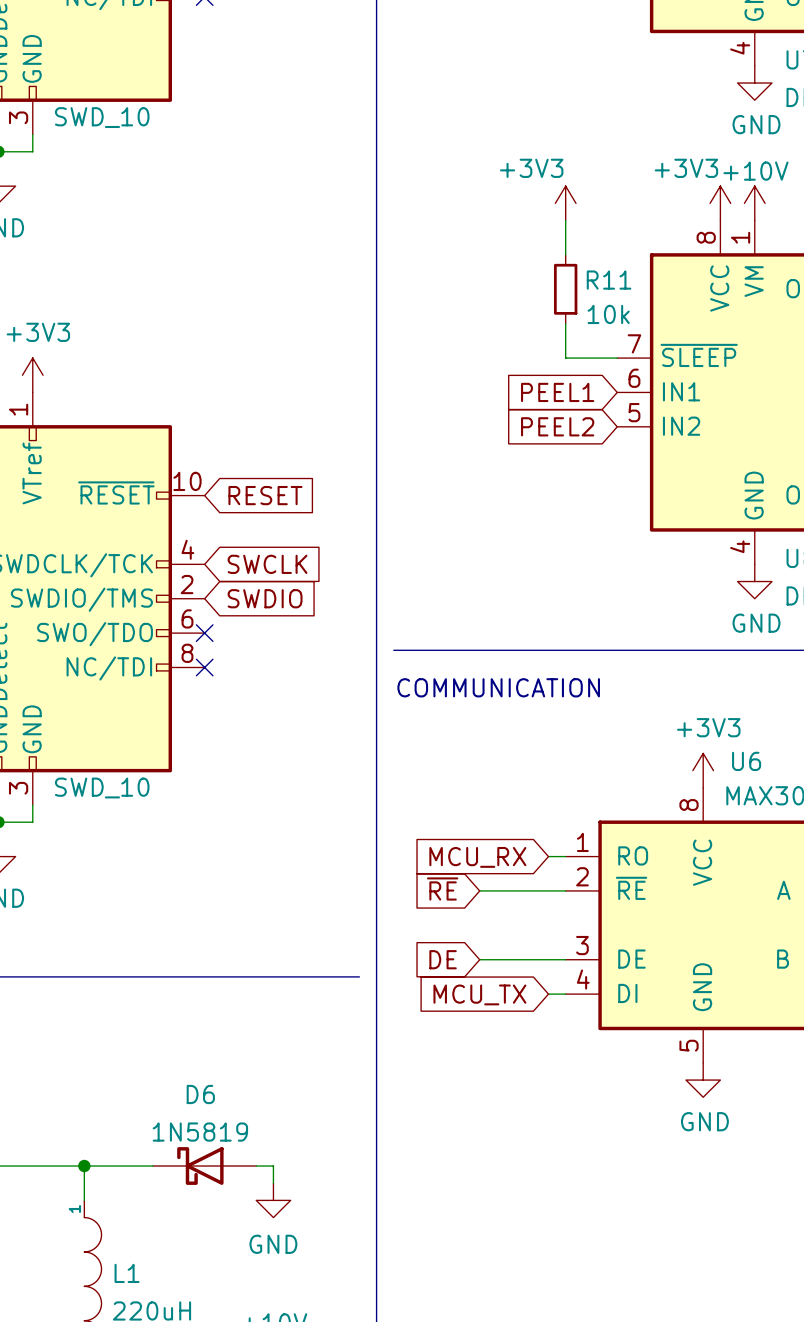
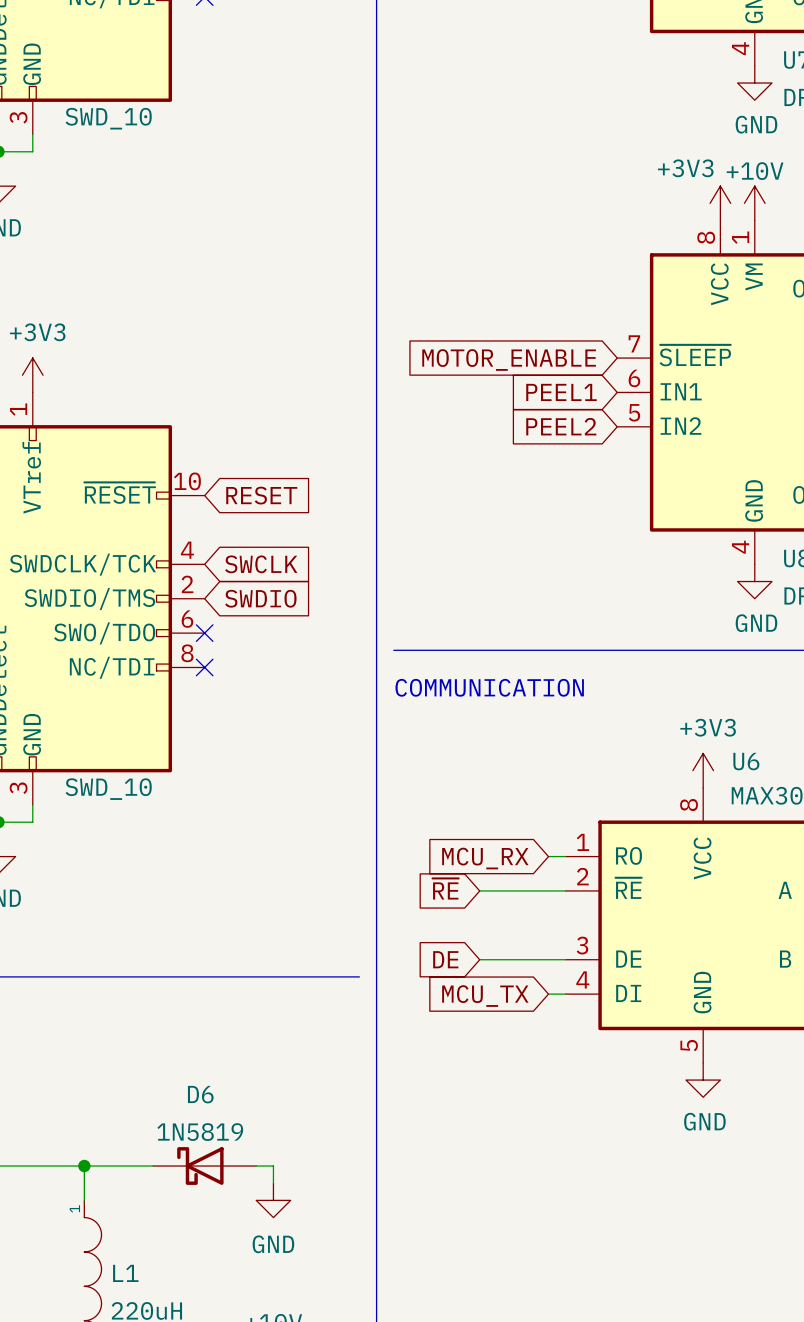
power symbol: +3V3 (565, 203) -> none
wire: (565, 220) (565, 254) -> none
R11: 10k (565, 289) -> none
wire: (565, 323) (565, 358) (617, 358) -> none
global label: none -> MOTOR_ENABLE (509, 359)

